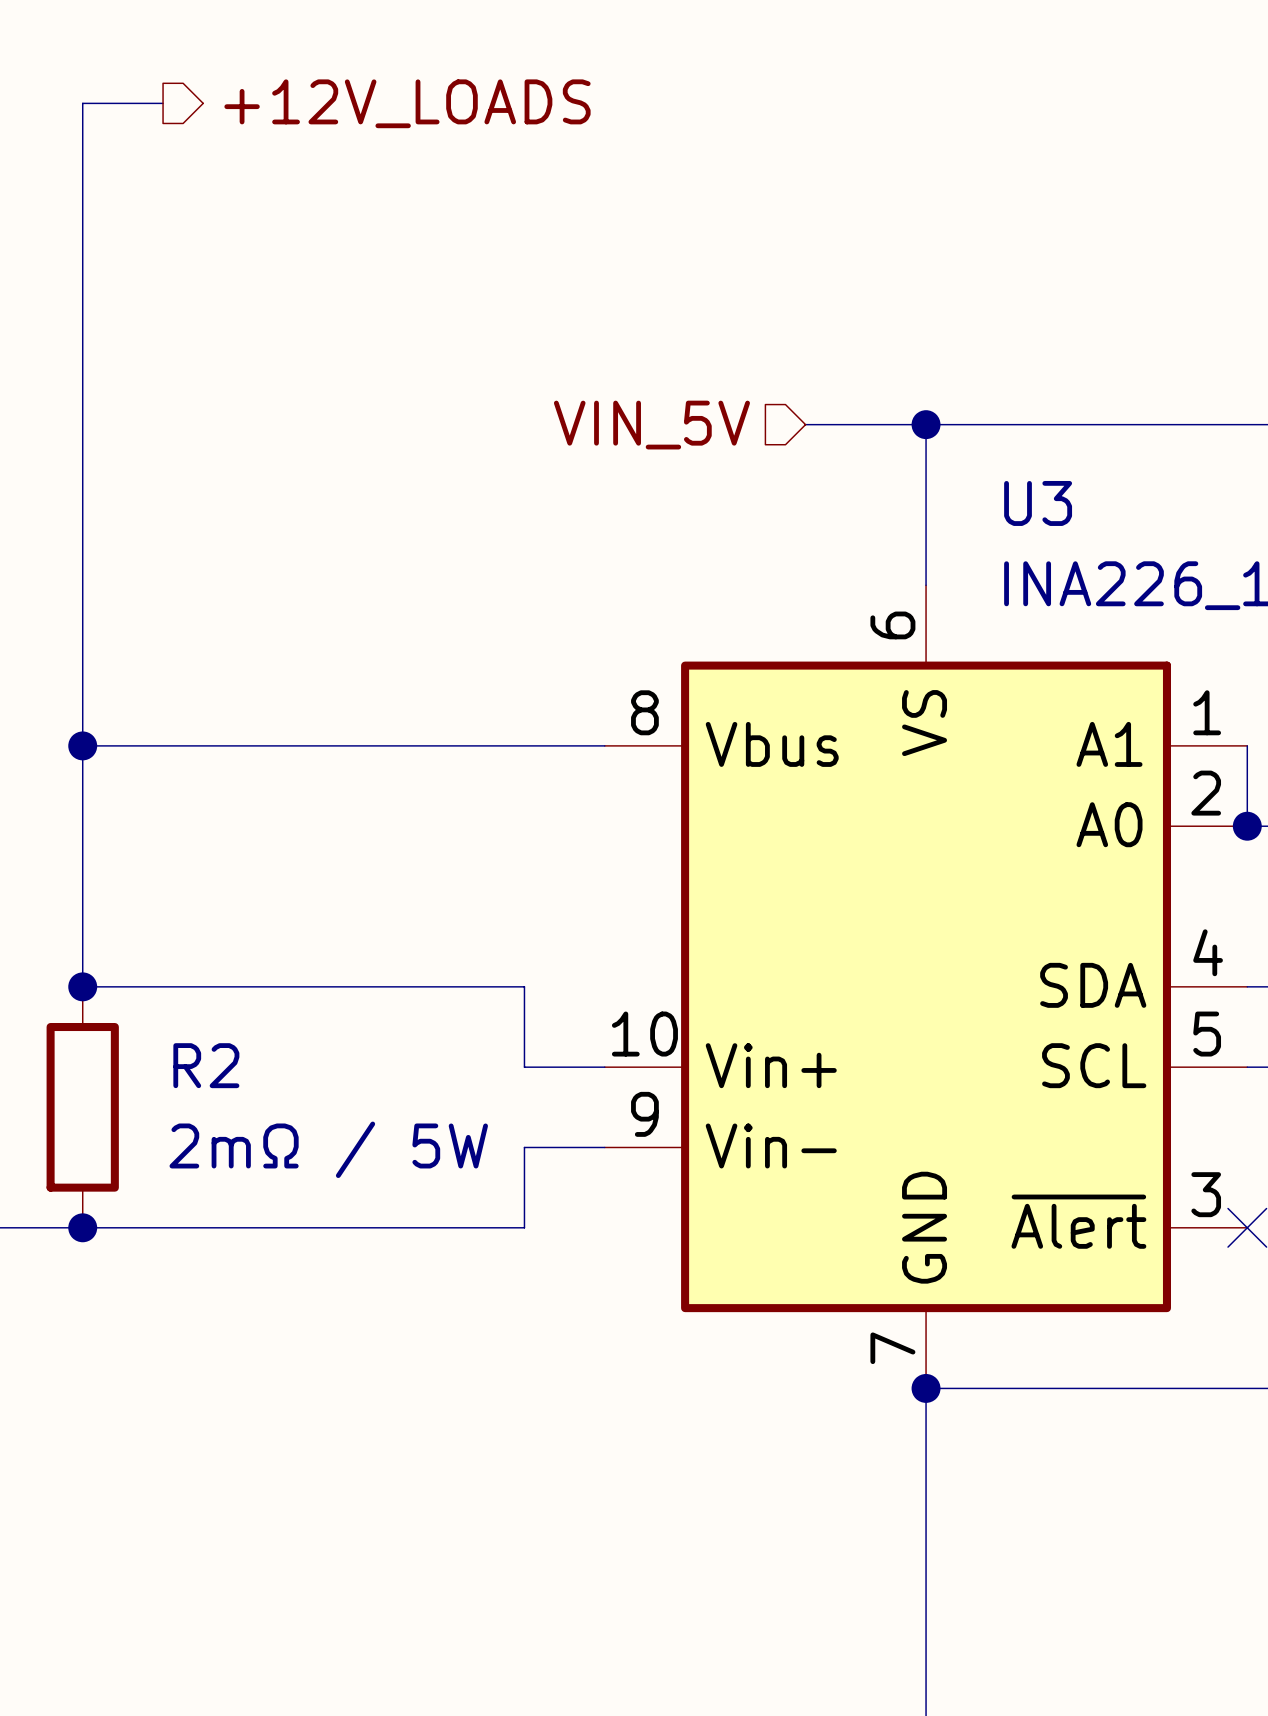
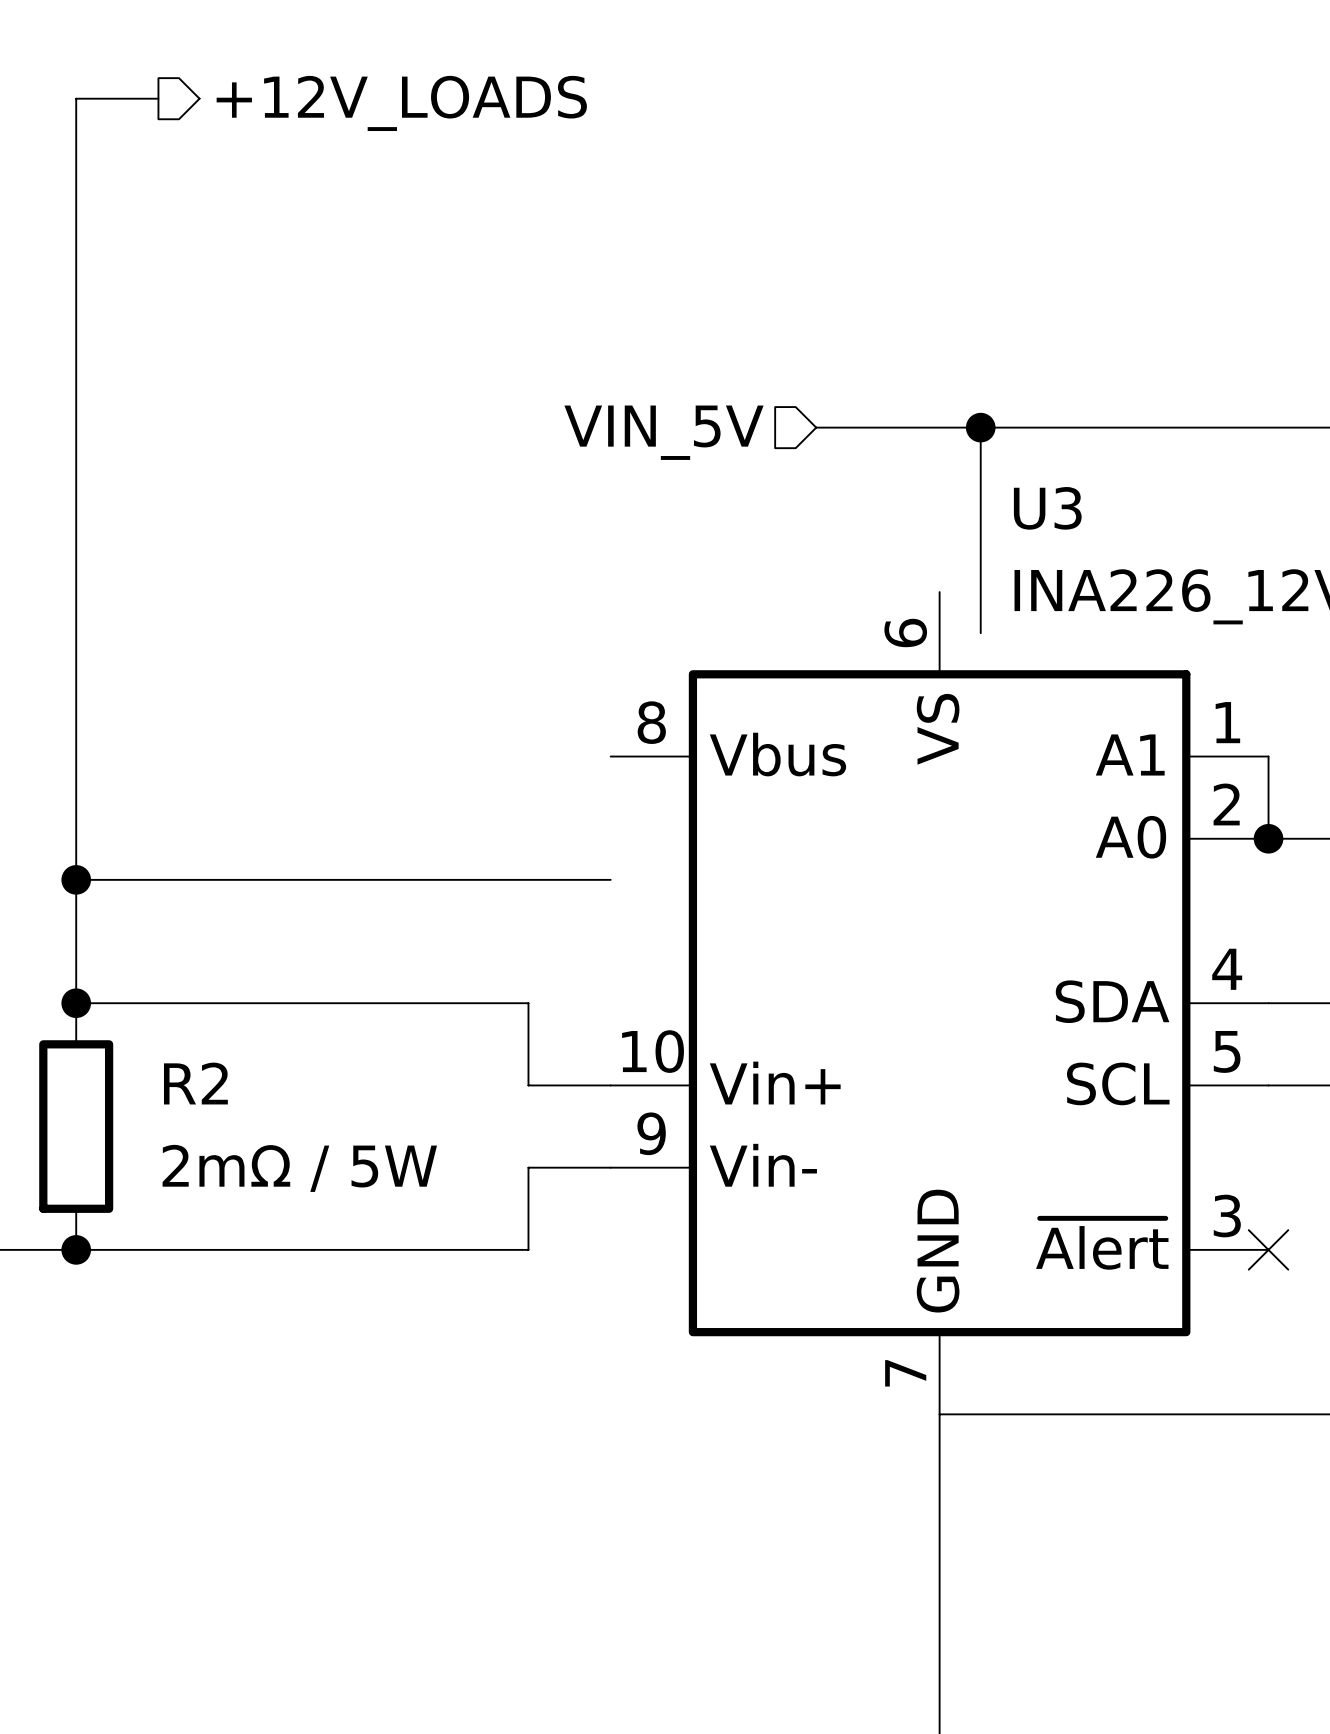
wire: (926, 424) (926, 585) -> none
junction position: (926, 424) -> (980, 427)
wire: none -> (980, 427) (980, 633)
wire: (82, 745) (604, 745) -> (76, 879) (610, 879)
junction position: (82, 745) -> (76, 879)
junction: (926, 1388) -> none

